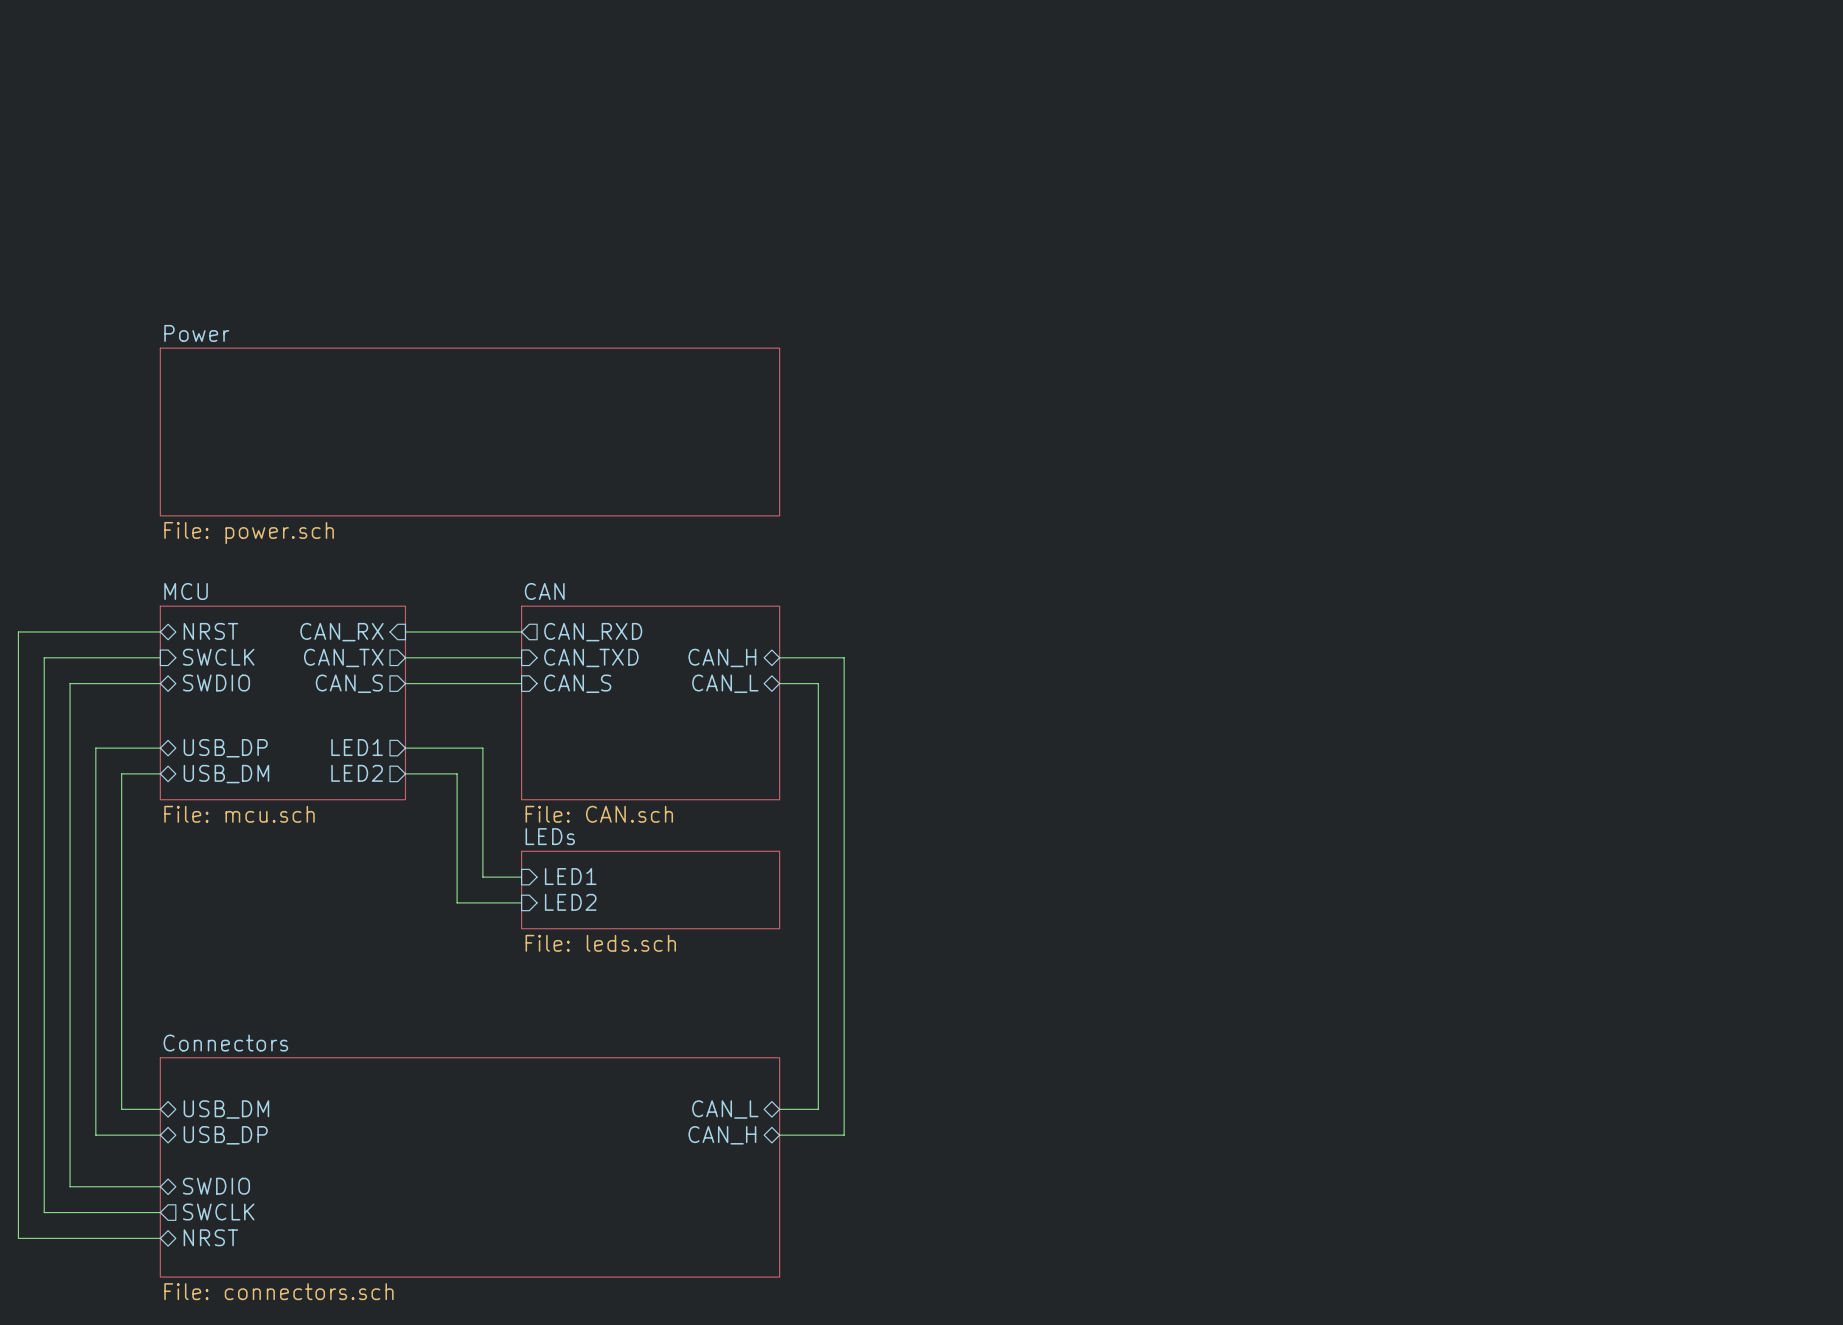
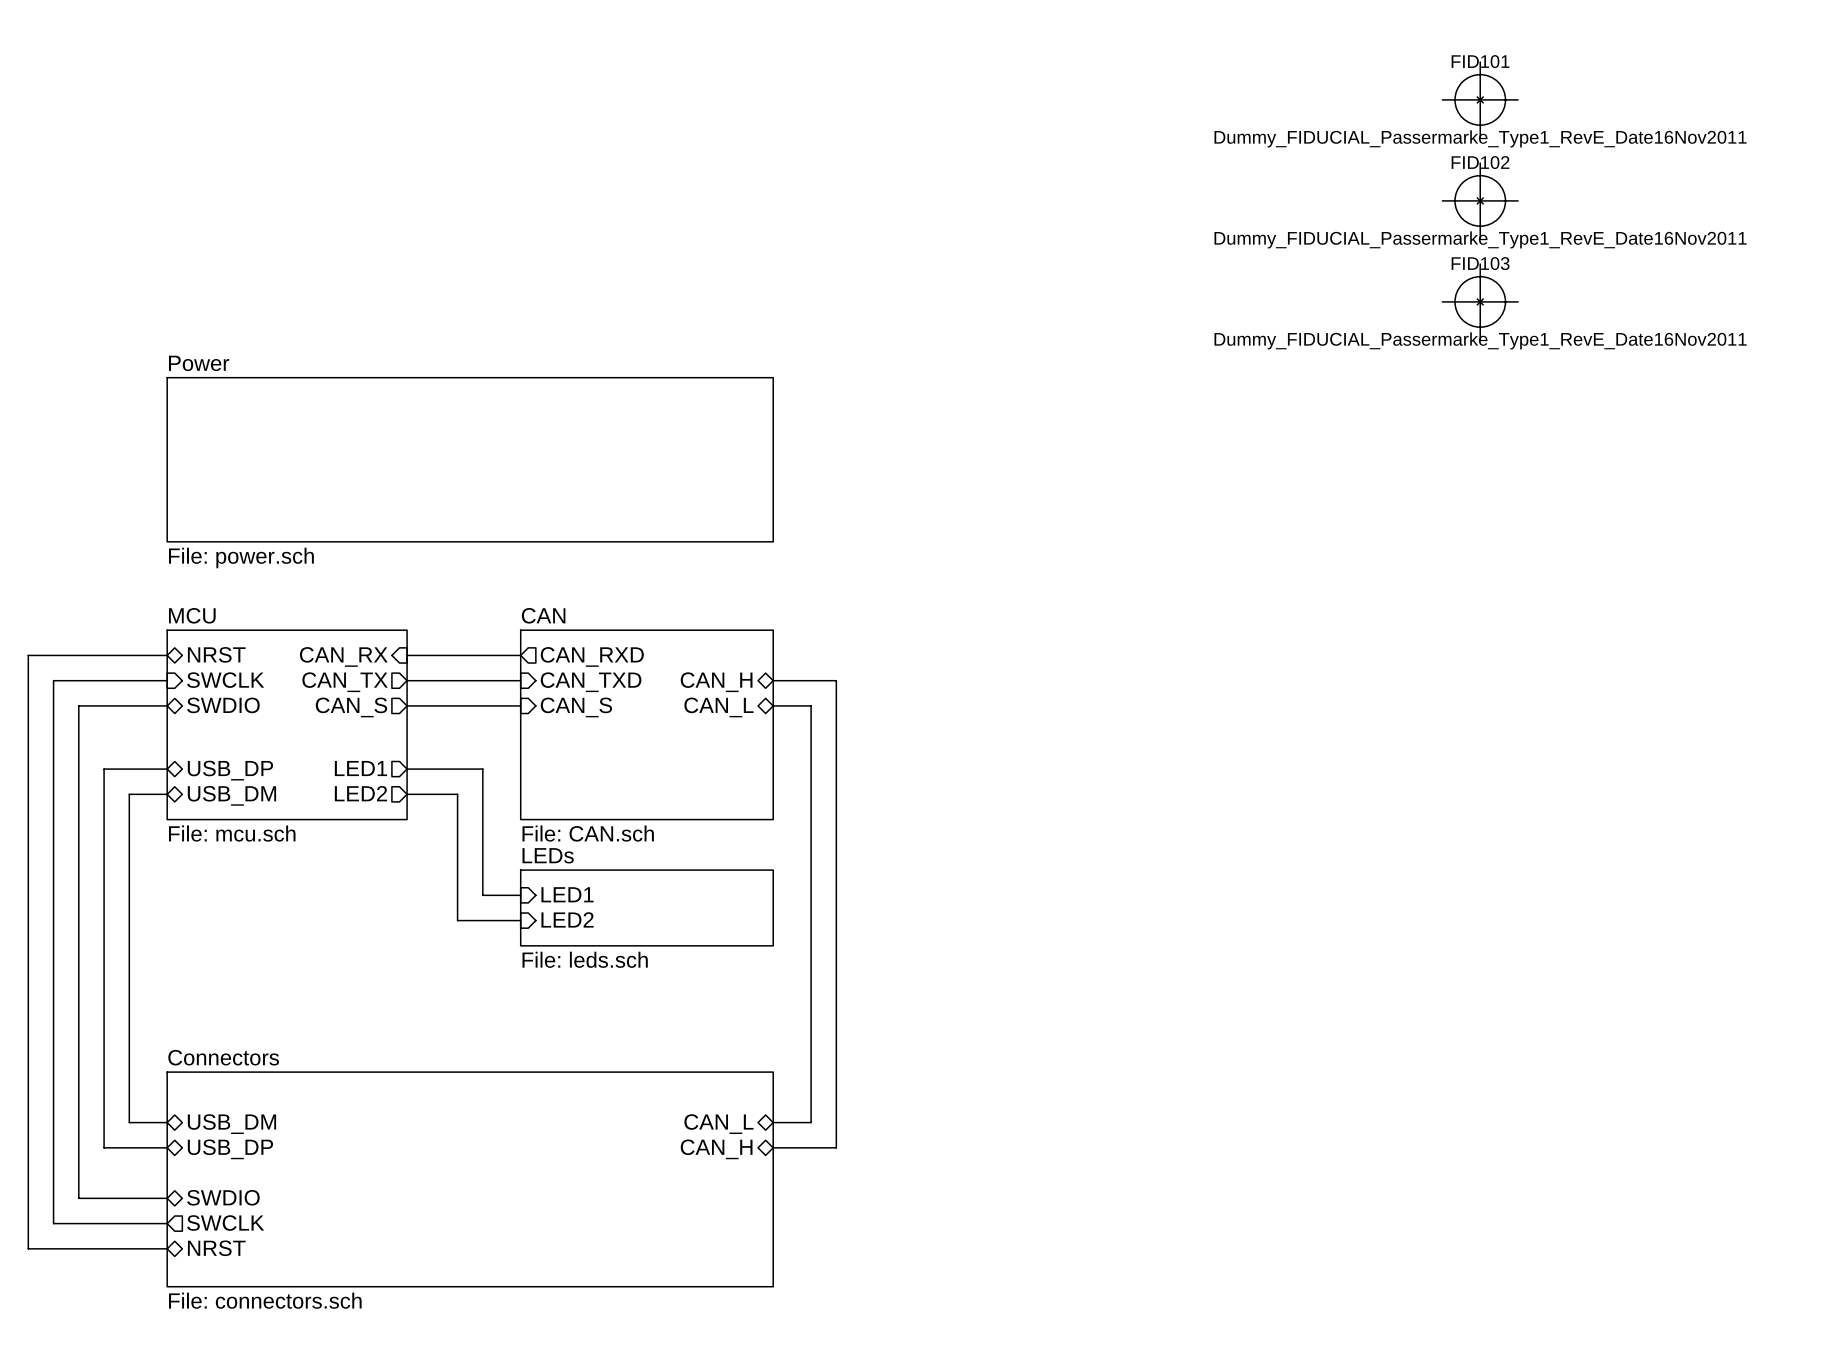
FID101: none -> Dummy_FIDUCIAL_Passermarke_Type1_RevE_Date16Nov2011 (1480, 99)
FID102: none -> Dummy_FIDUCIAL_Passermarke_Type1_RevE_Date16Nov2011 (1480, 200)
FID103: none -> Dummy_FIDUCIAL_Passermarke_Type1_RevE_Date16Nov2011 (1480, 301)

